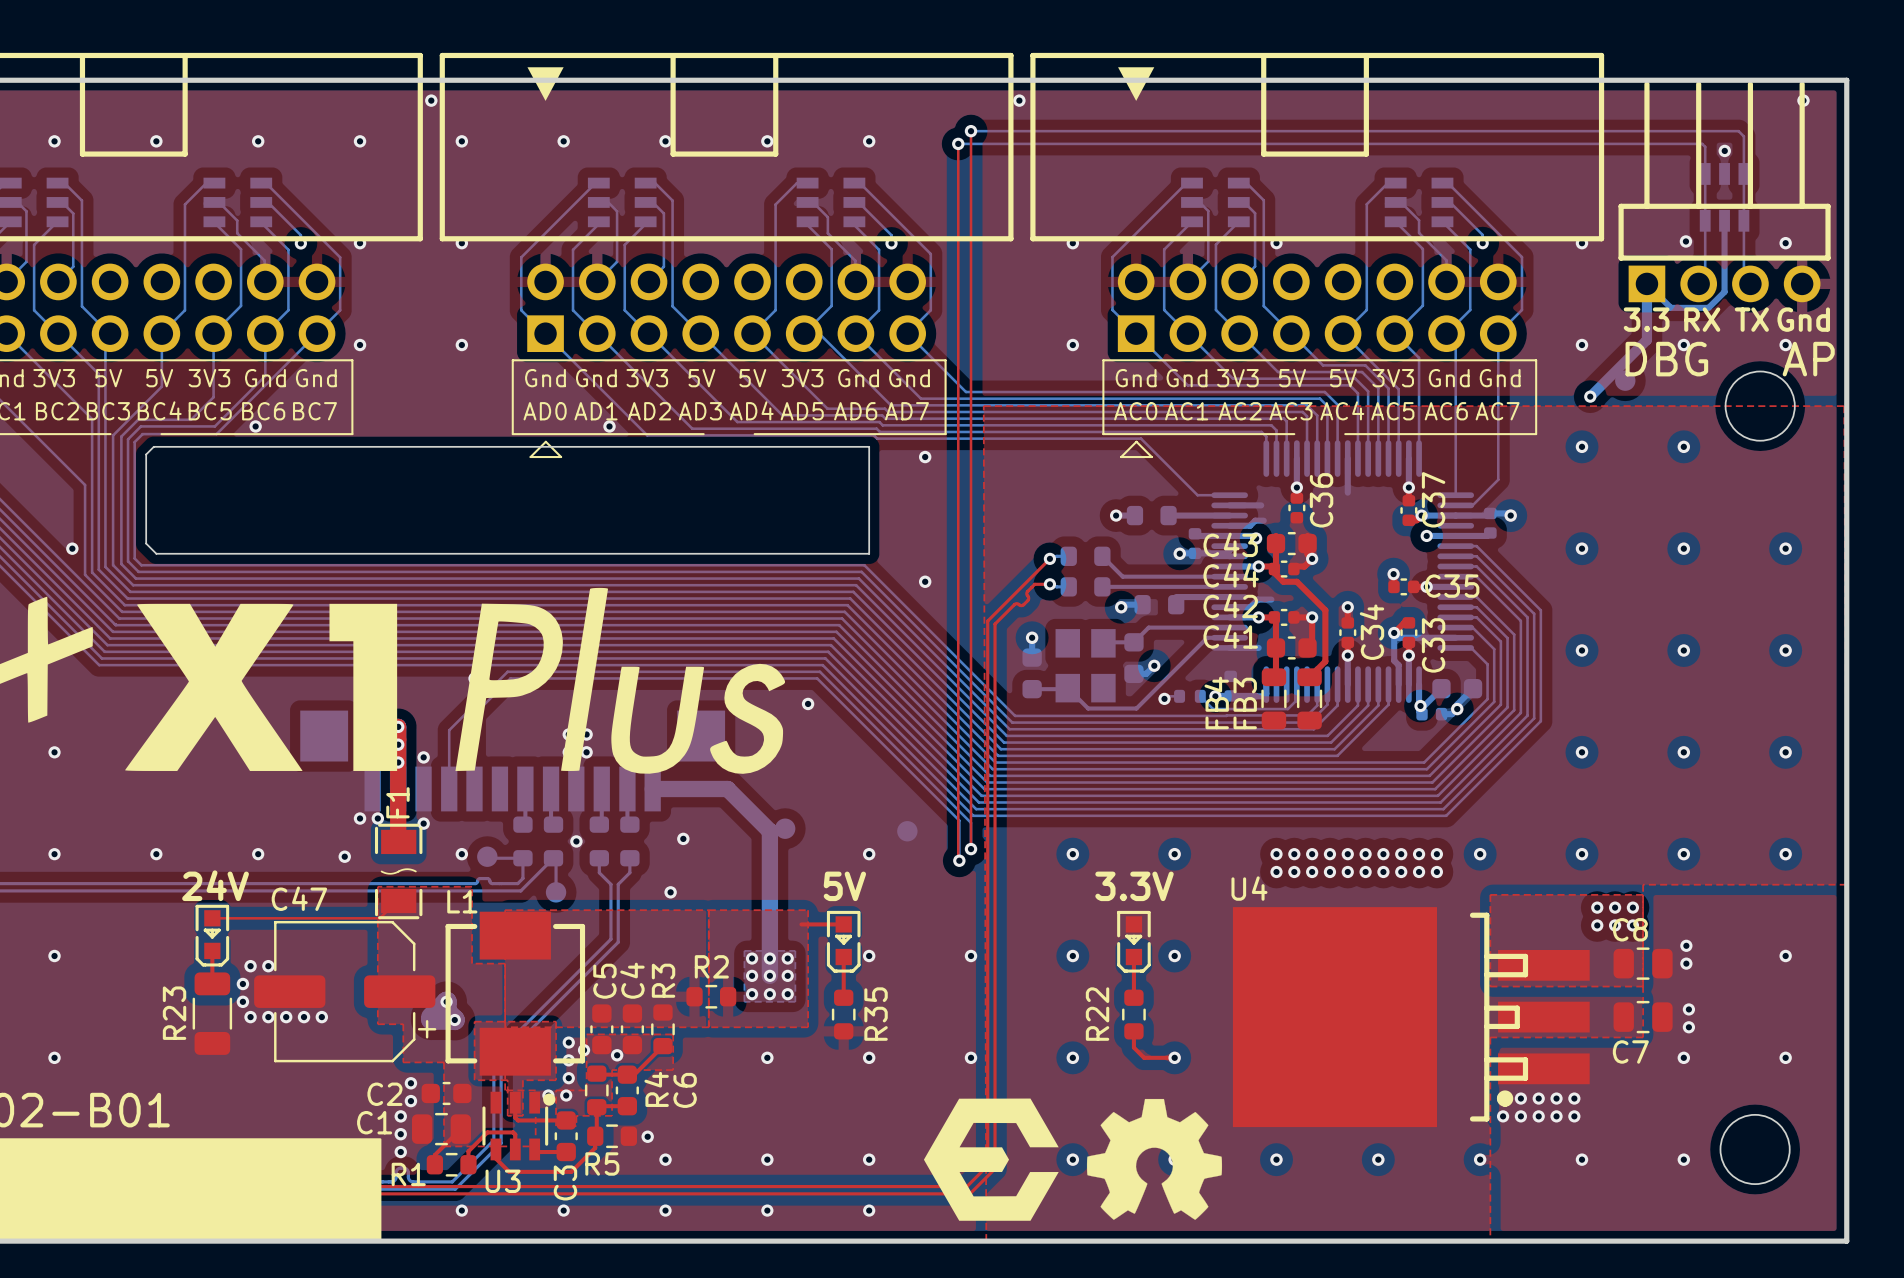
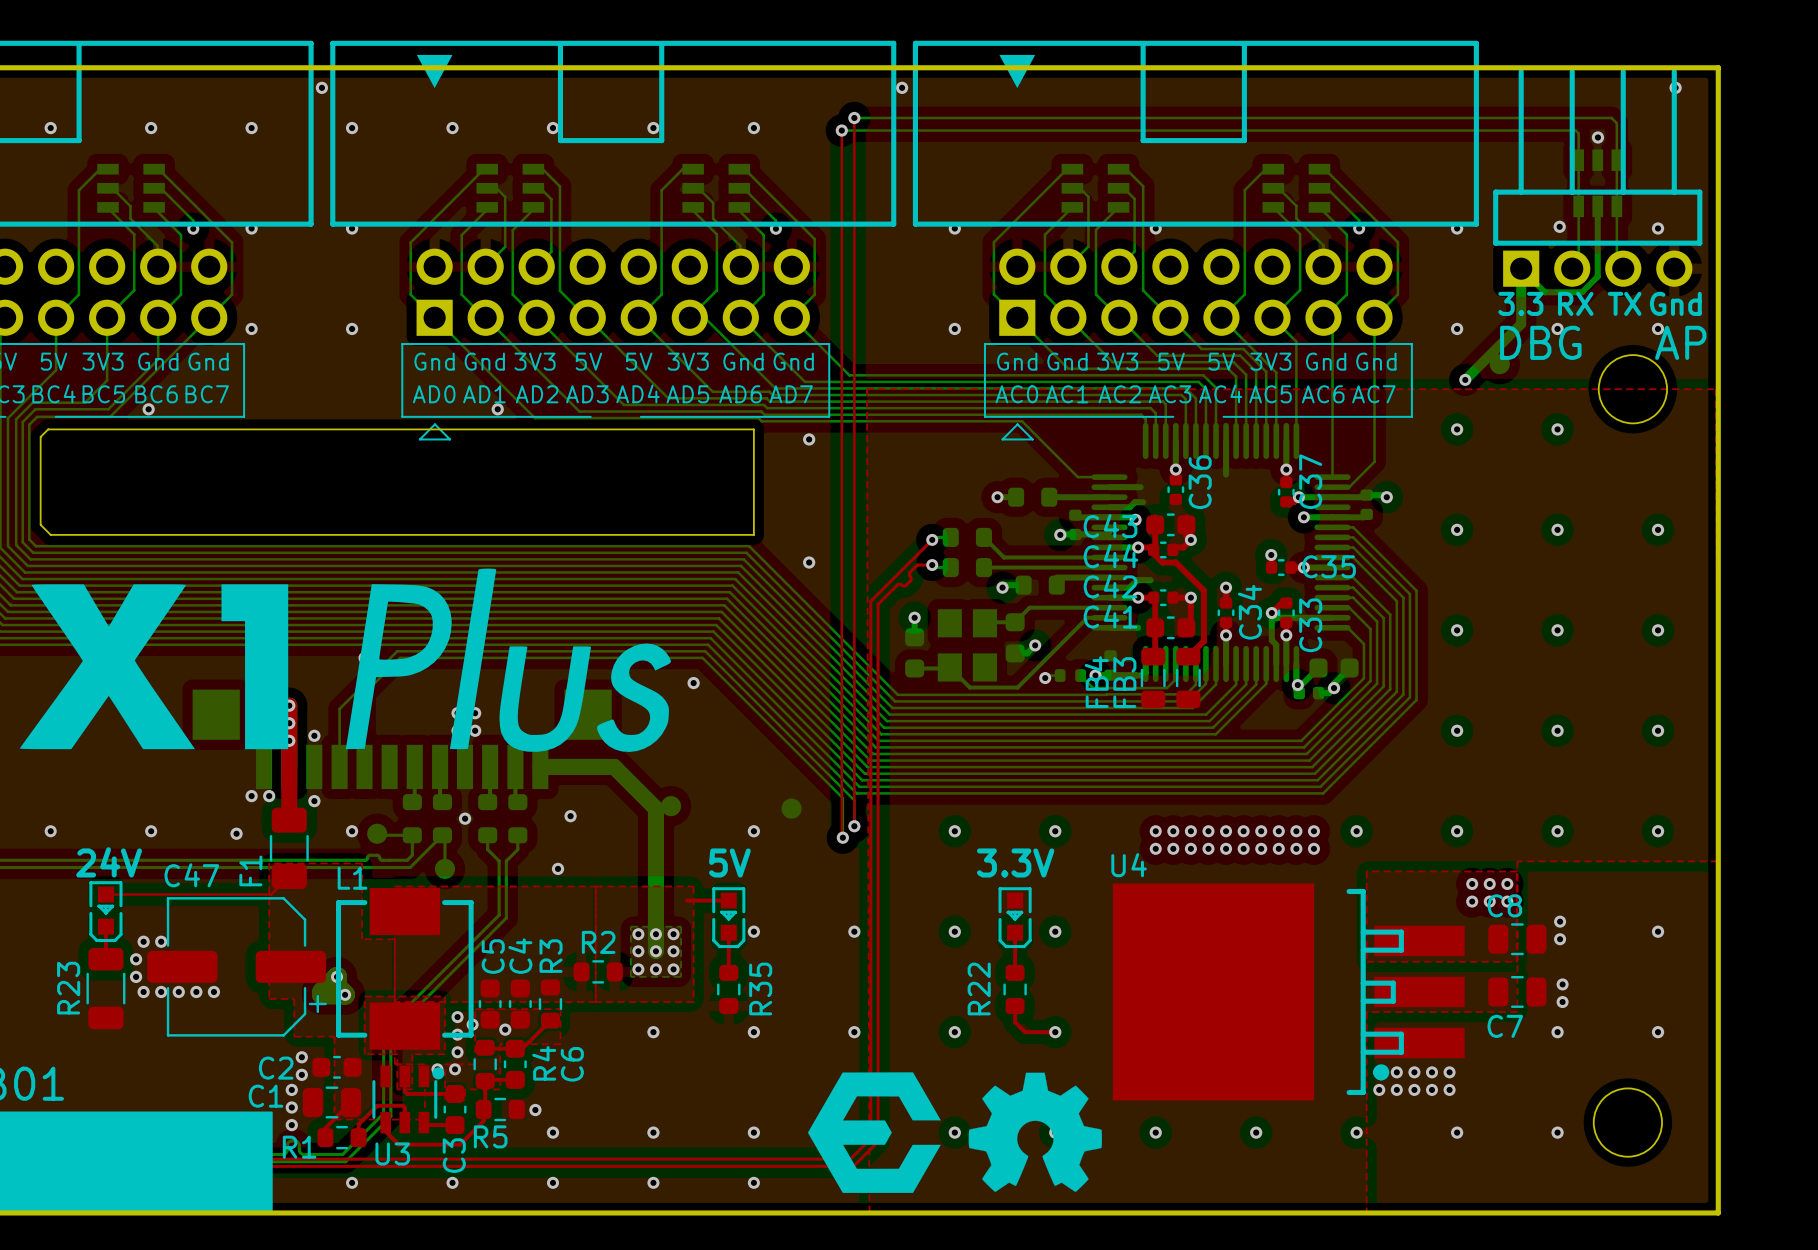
F1 name position: F1 (397, 802) -> F1 (250, 870)
F1 footprint: [374, 823, 423, 920] -> [269, 807, 309, 890]

